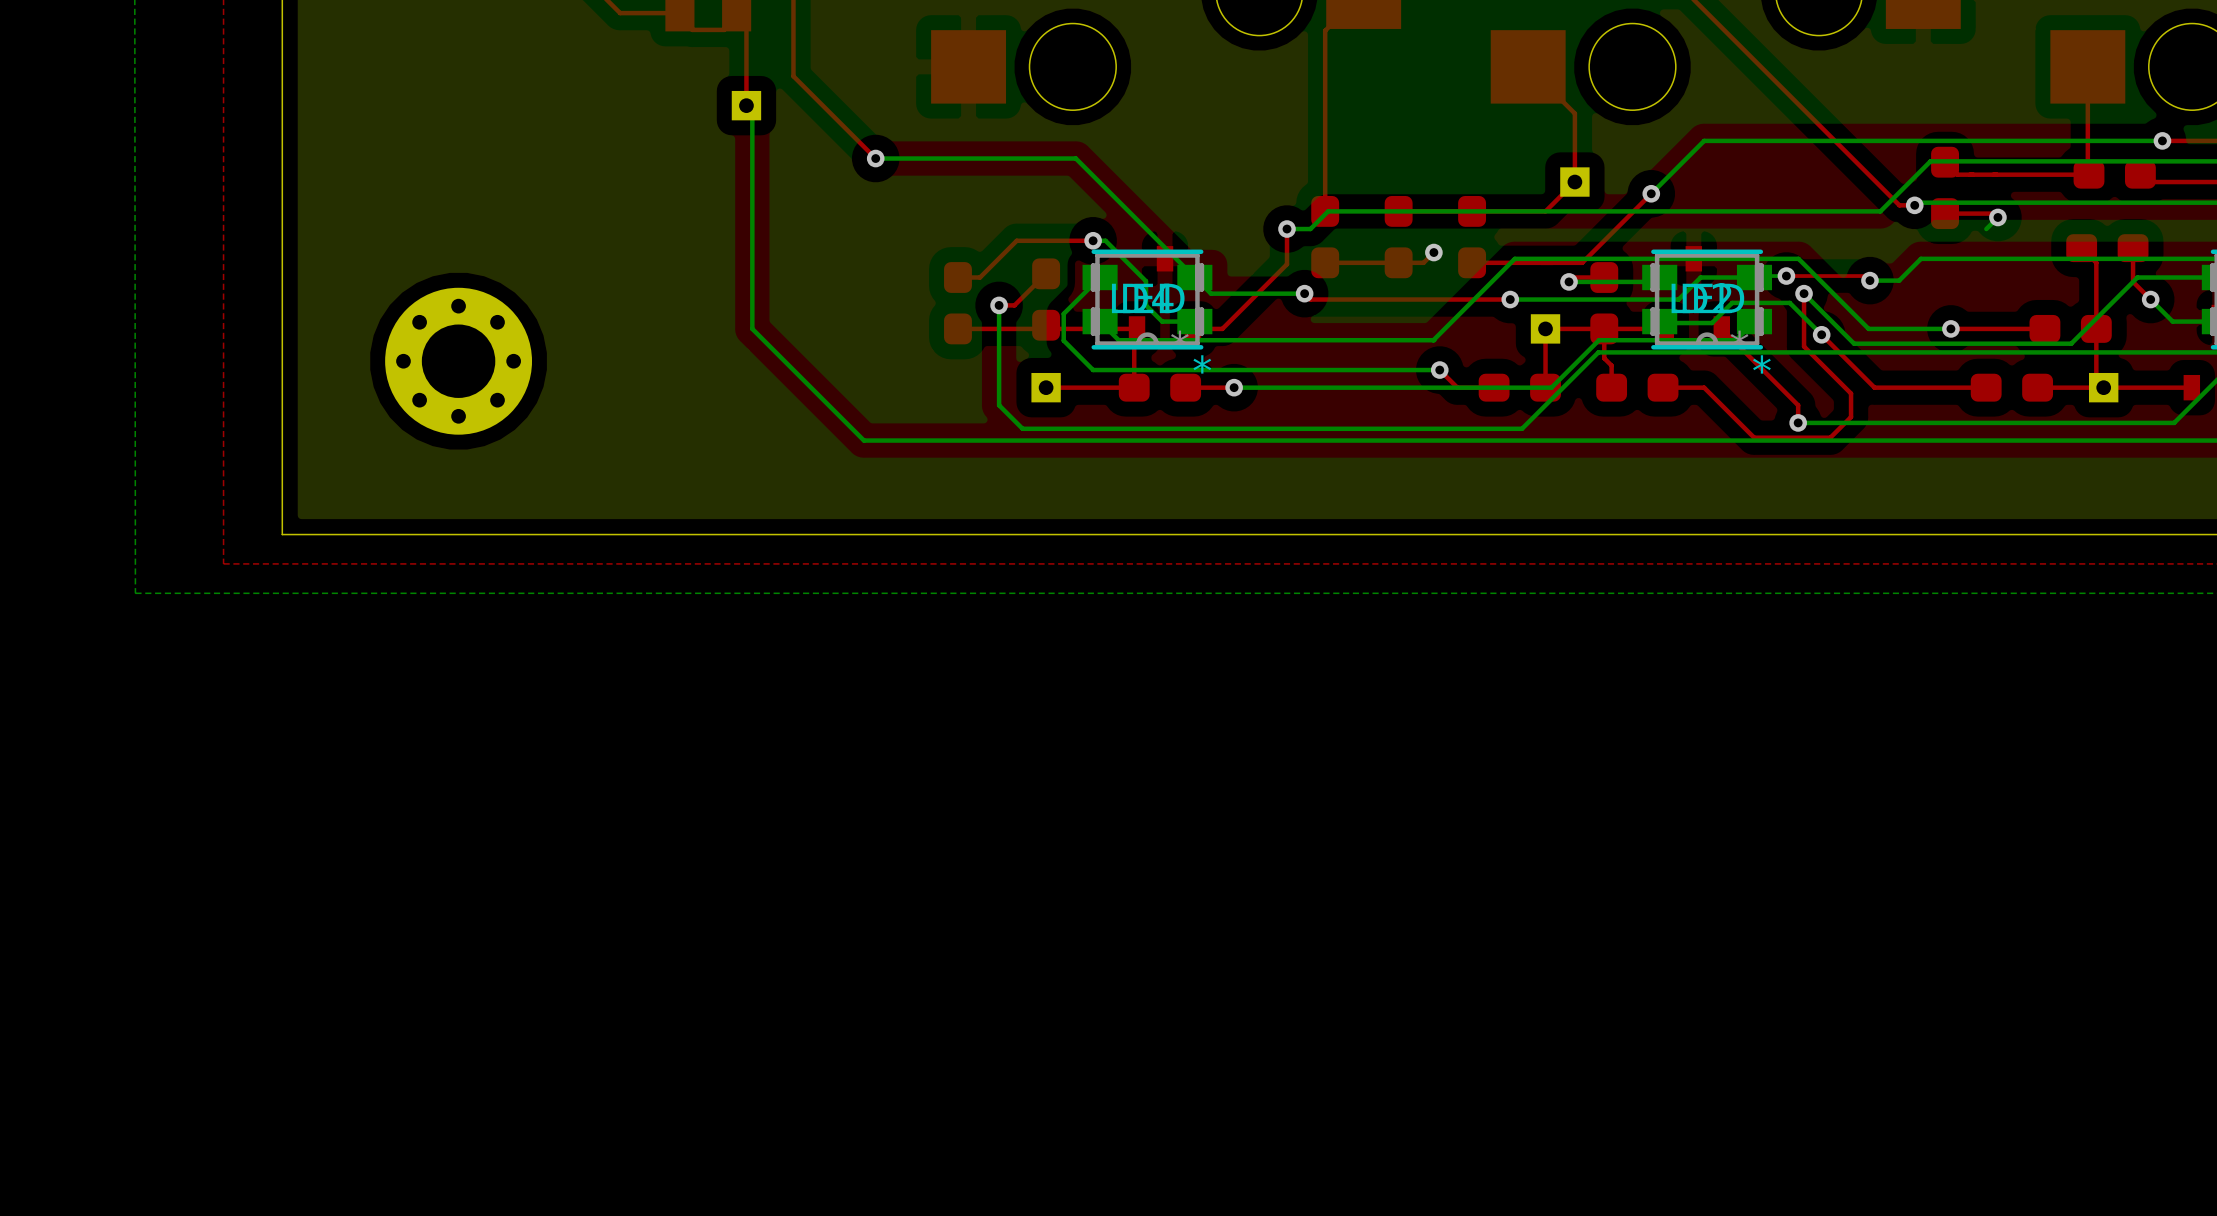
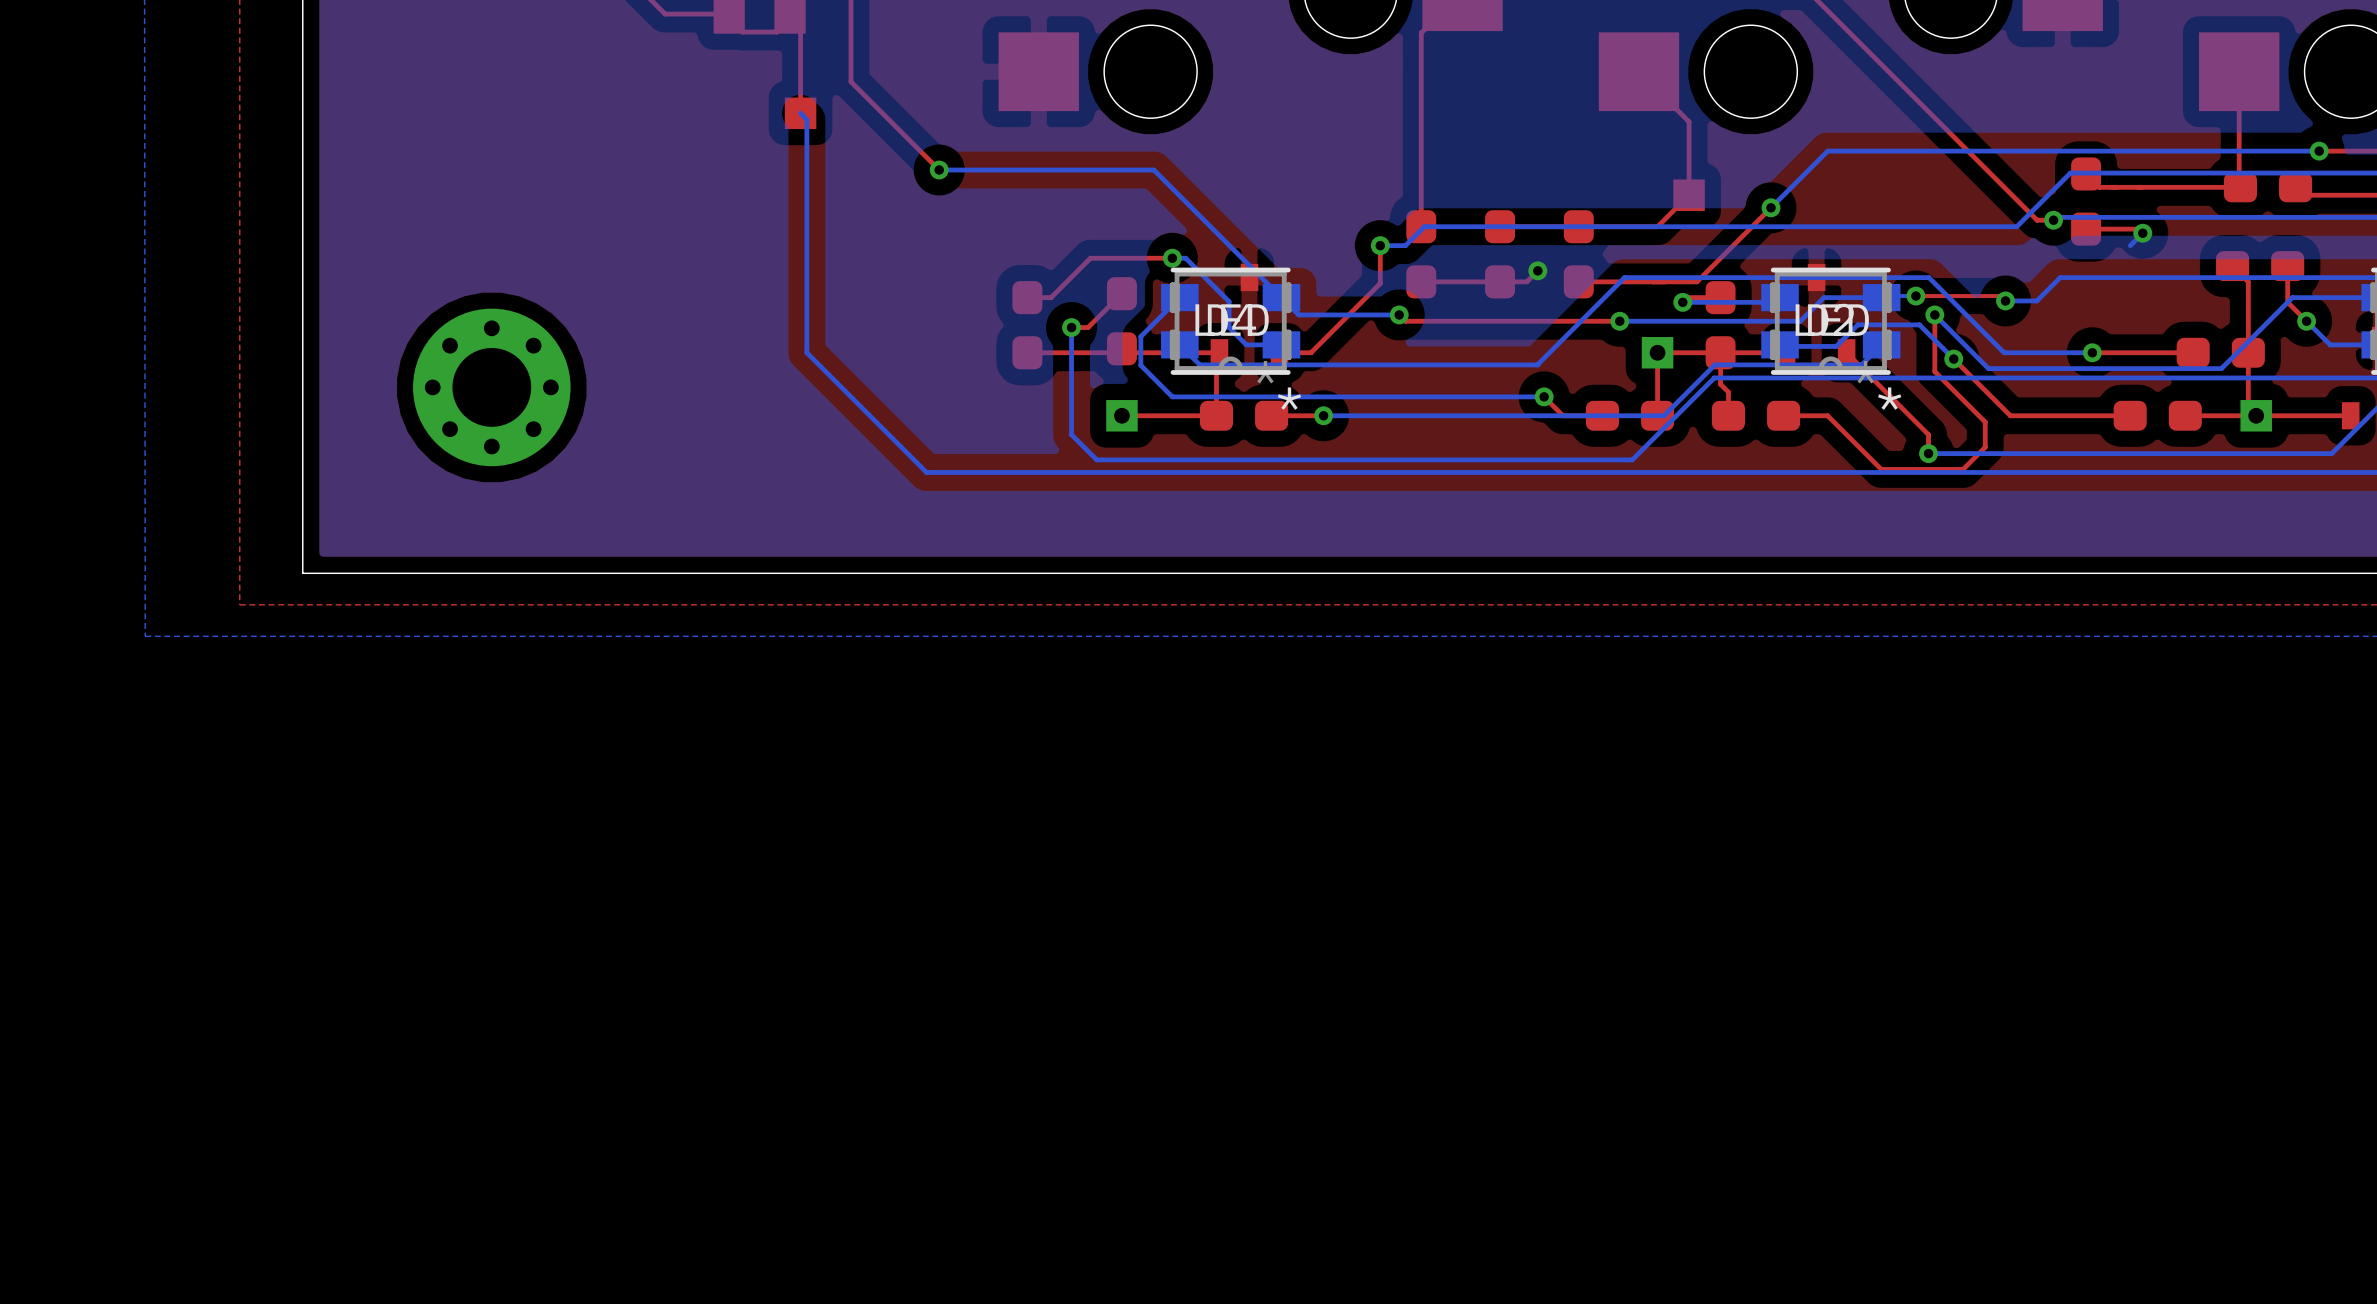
part footprint: [731, 90, 762, 121] -> [784, 97, 817, 130]
part footprint: [1560, 167, 1590, 197] -> [1673, 179, 1705, 211]

